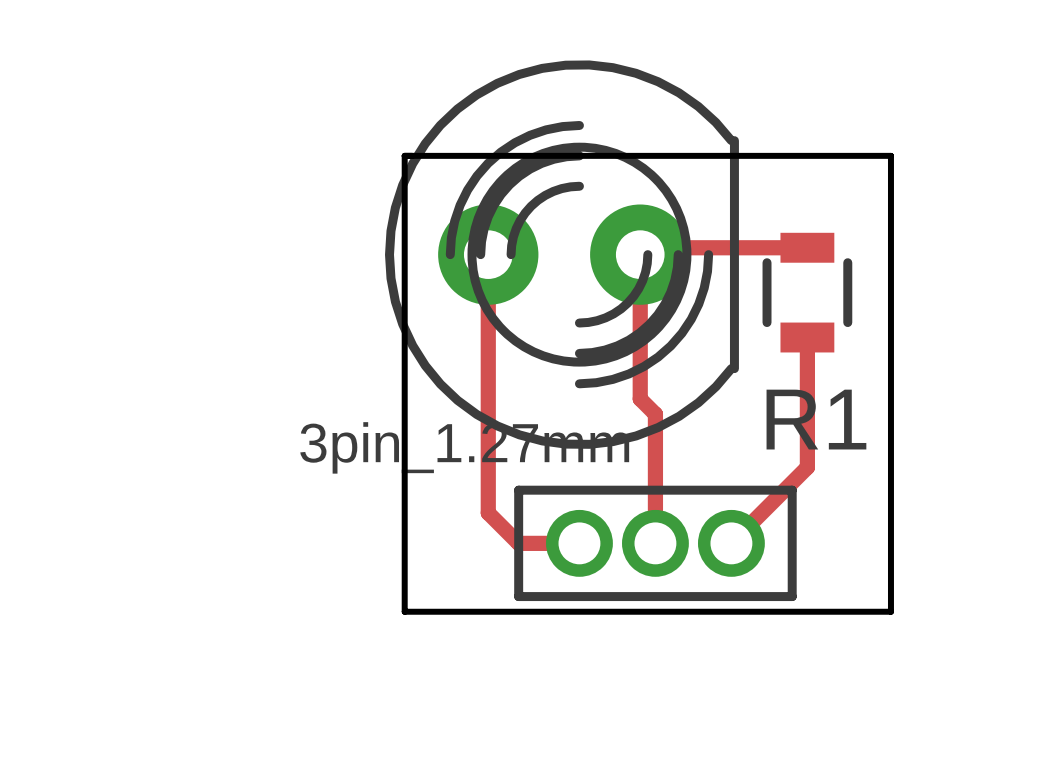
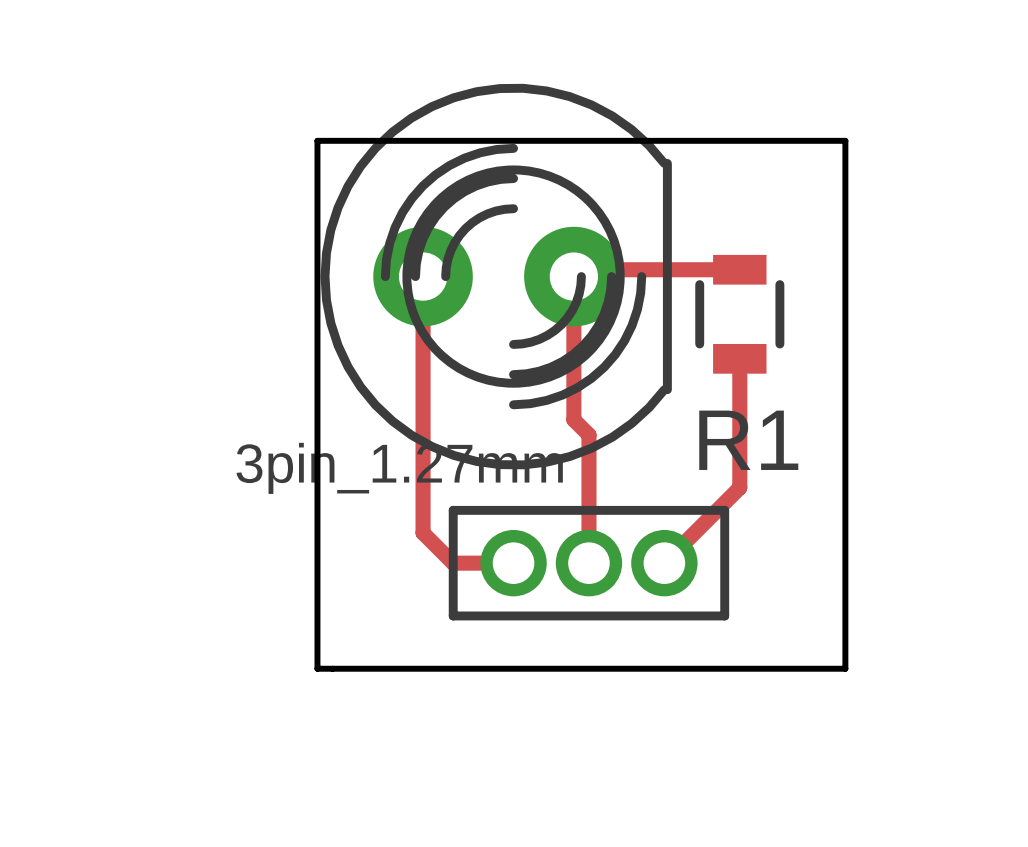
board edge: (404, 155) (890, 155) (890, 611) (404, 611) (404, 155) -> (317, 140) (317, 668) (845, 668) (845, 140) (317, 140)

